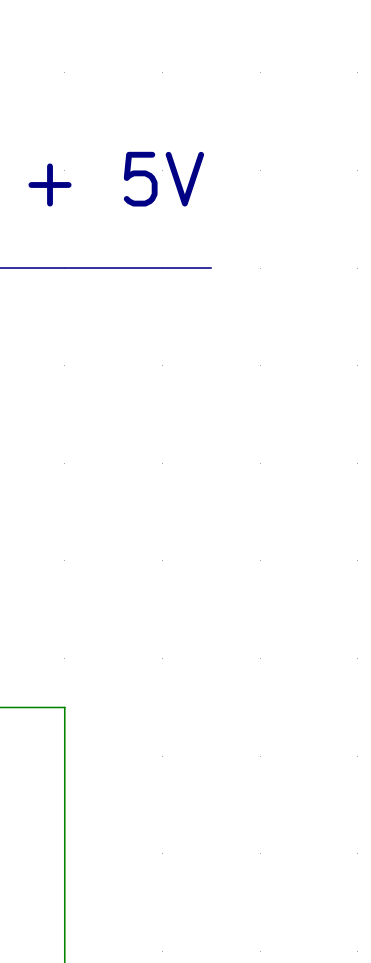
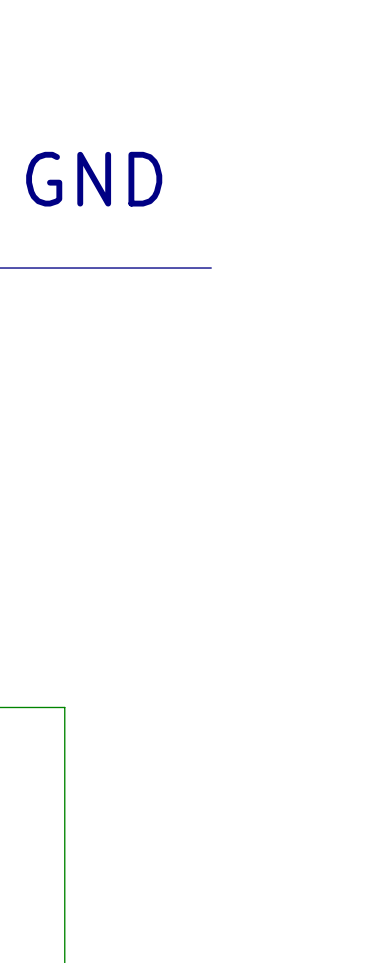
text: + 5V (116, 179) -> GND (94, 179)

